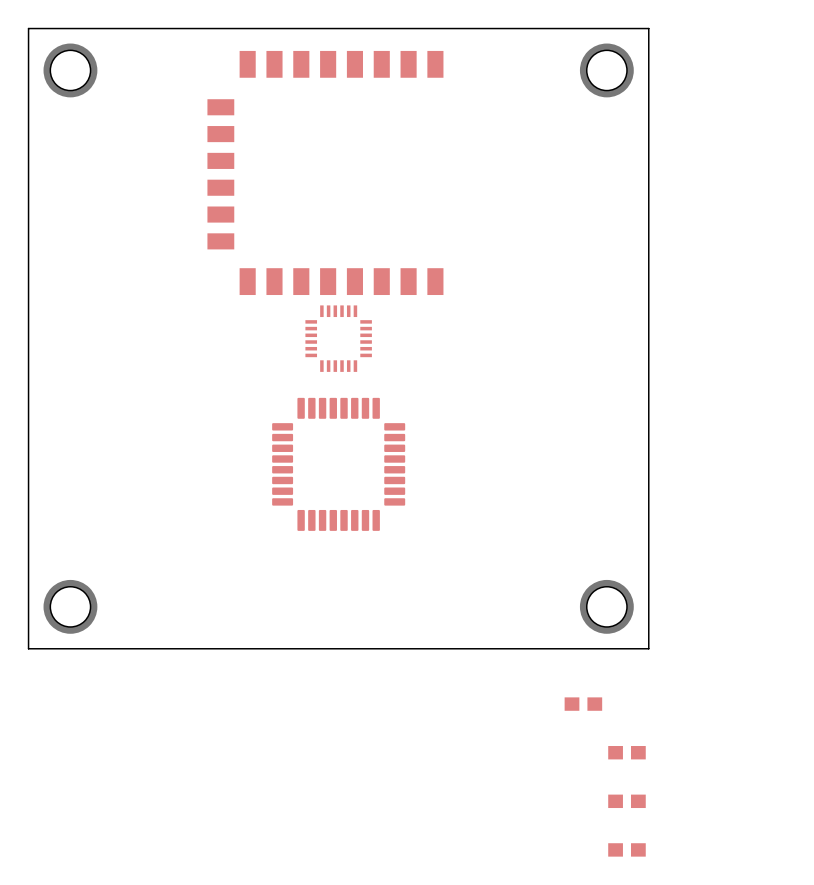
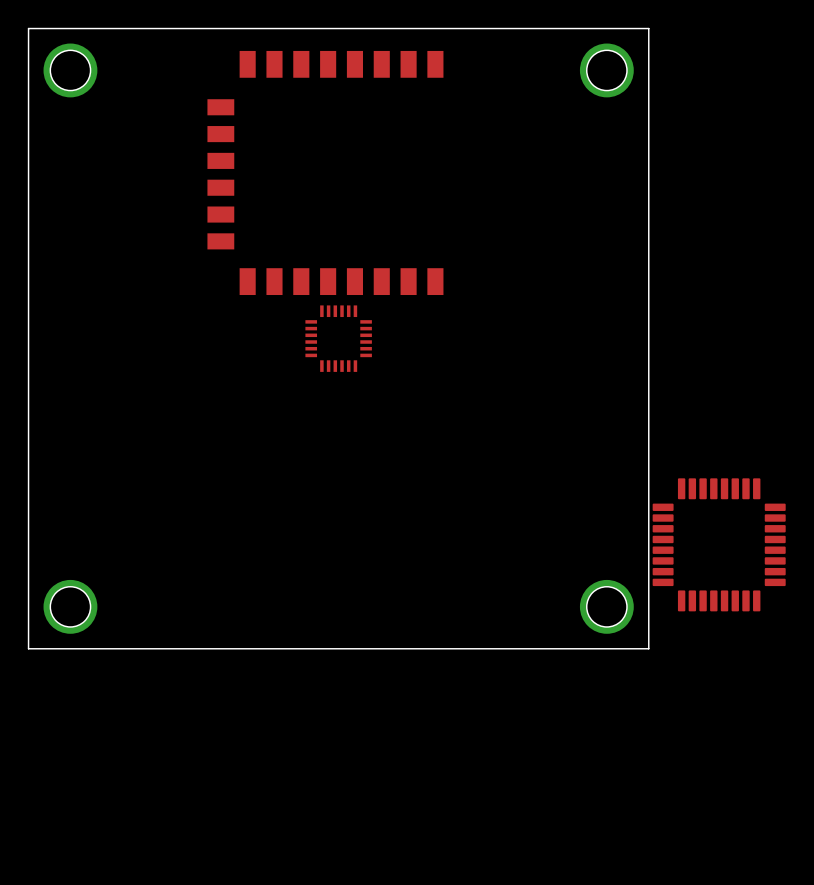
part: (338, 464) -> none
part: none -> (719, 544)
part: (583, 704) -> none
part: (626, 752) -> none
part: (626, 801) -> none
part: (626, 849) -> none

